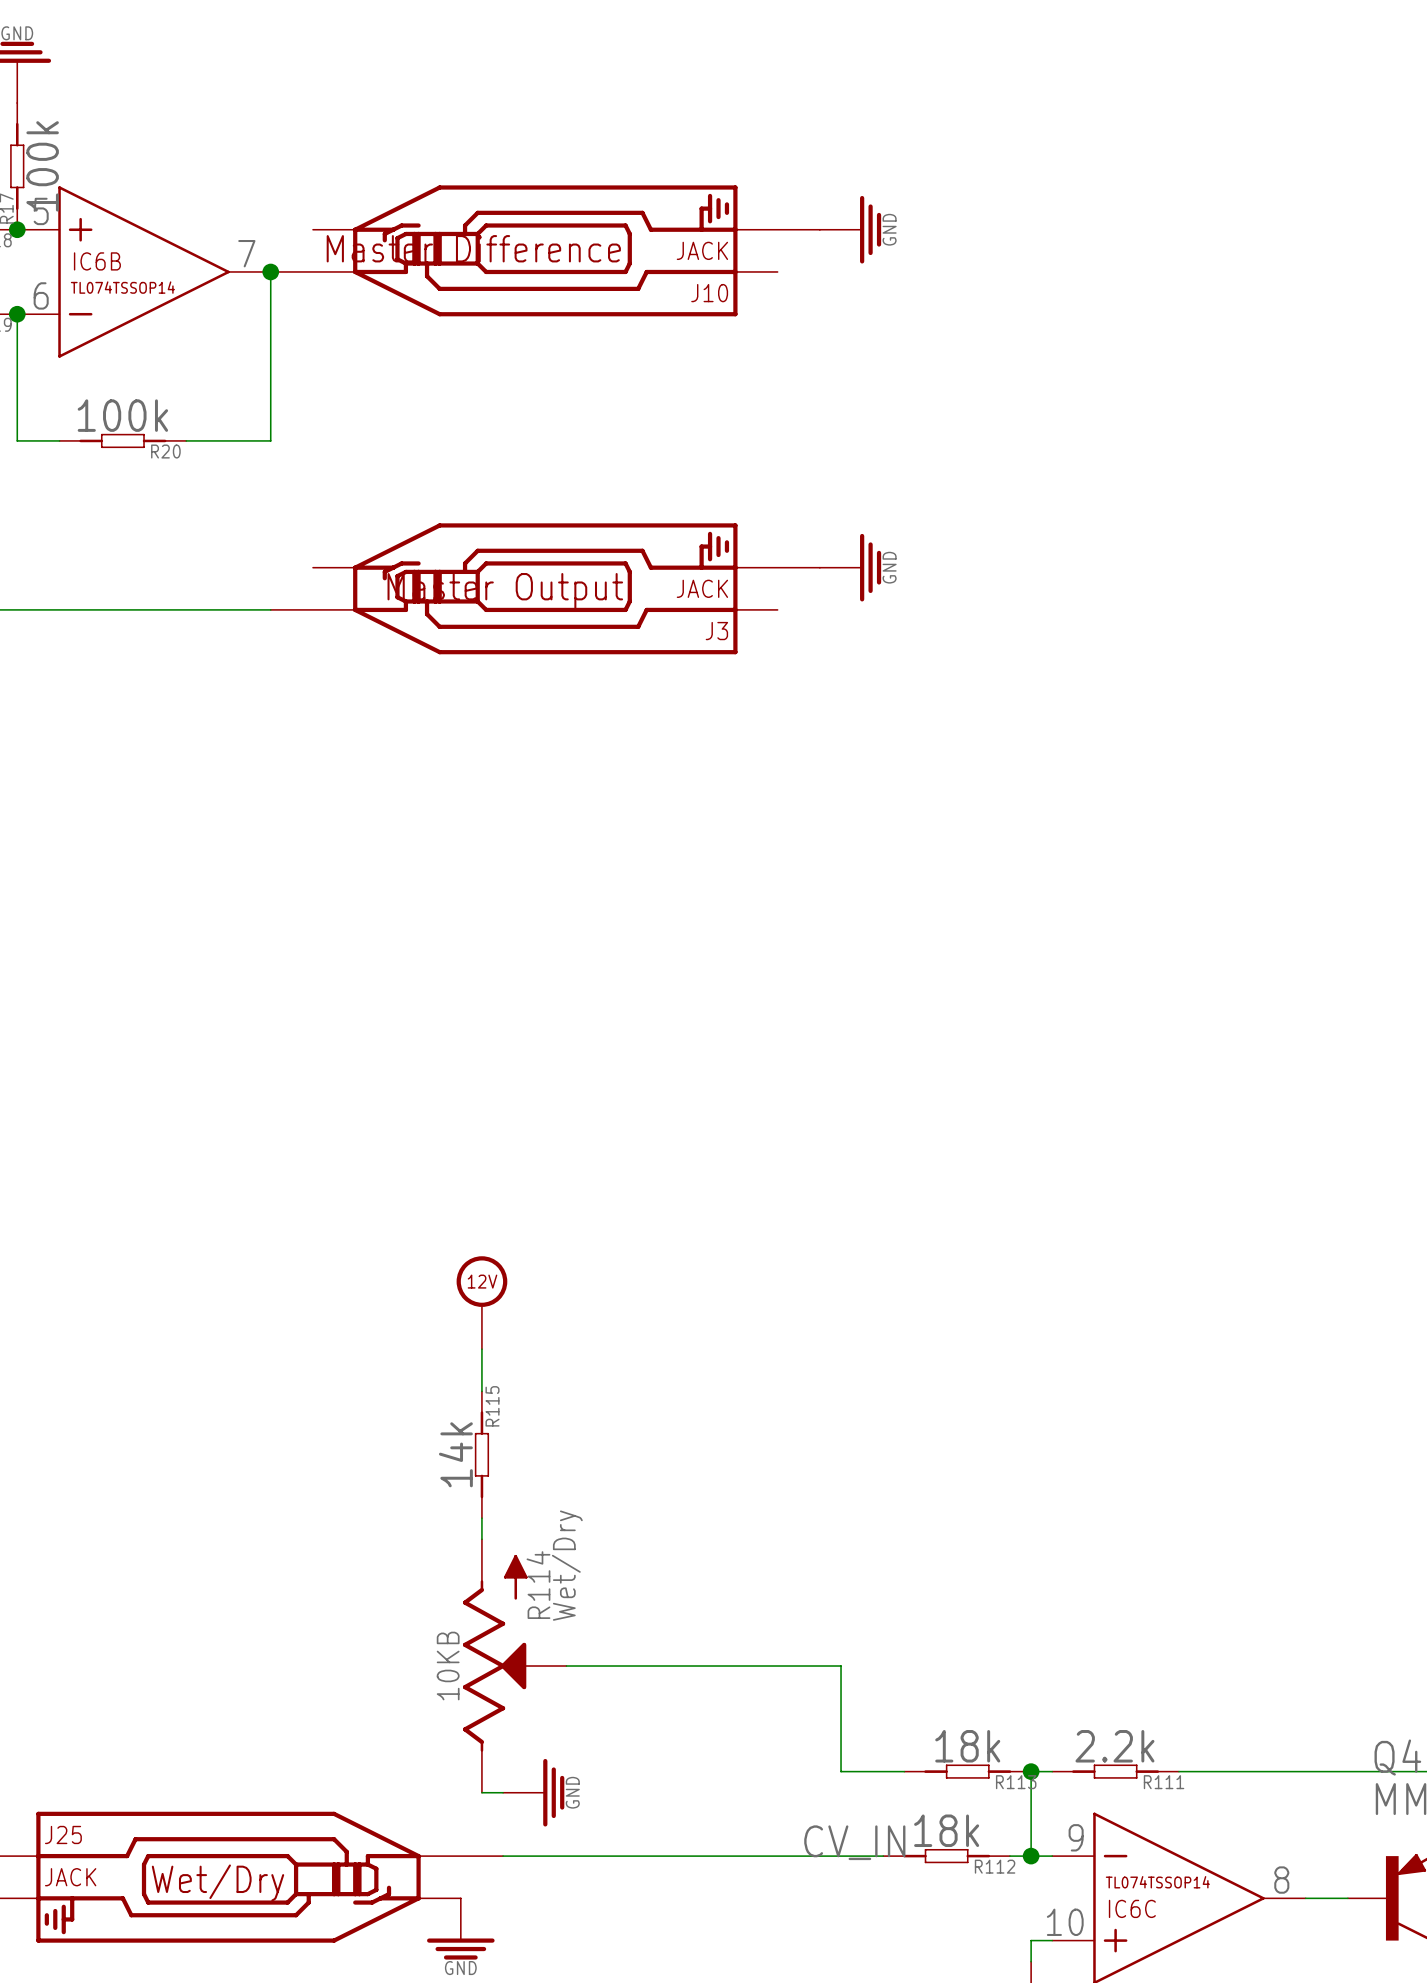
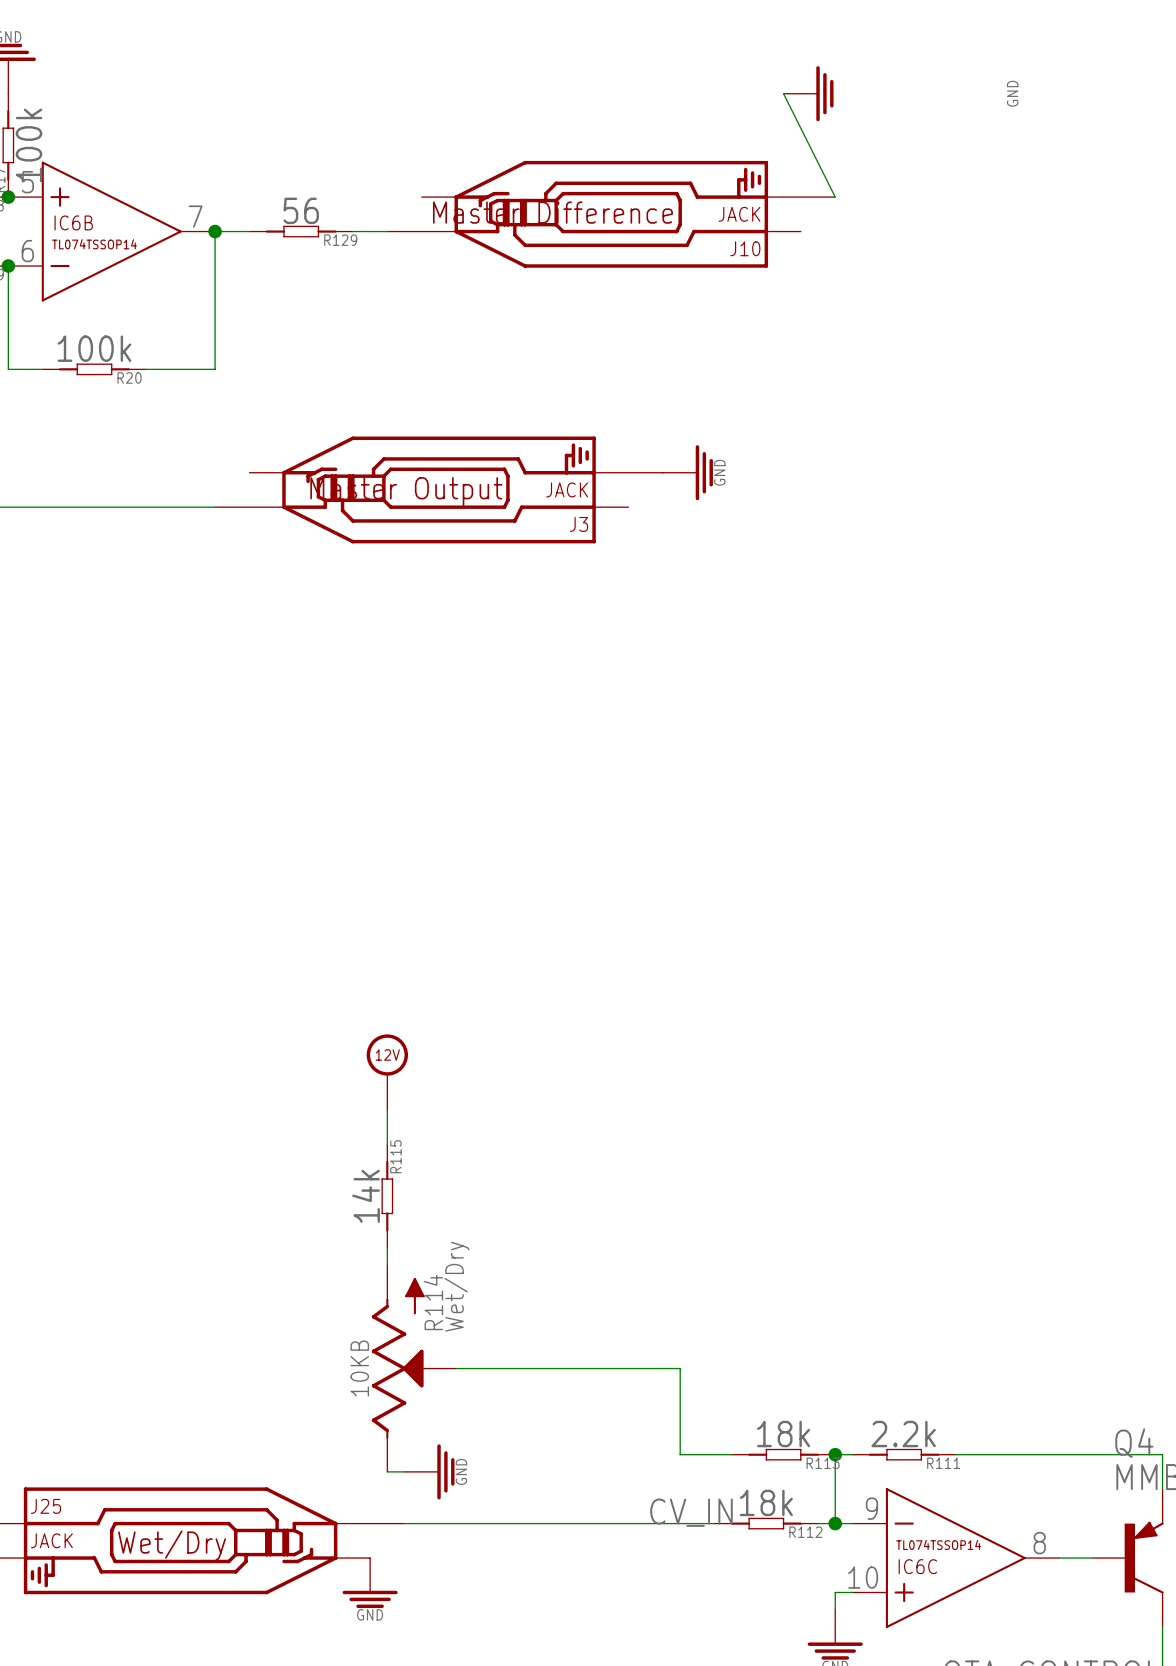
wire: none -> (783, 93) (835, 197)
power symbol position: GND (850, 229) -> GND (808, 93)
power symbol text position: GND (889, 229) -> GND (1012, 93)
J10 position: (545, 250) -> (611, 214)
R129: none -> 56 (301, 231)
wire: none -> (352, 231) (387, 231)

